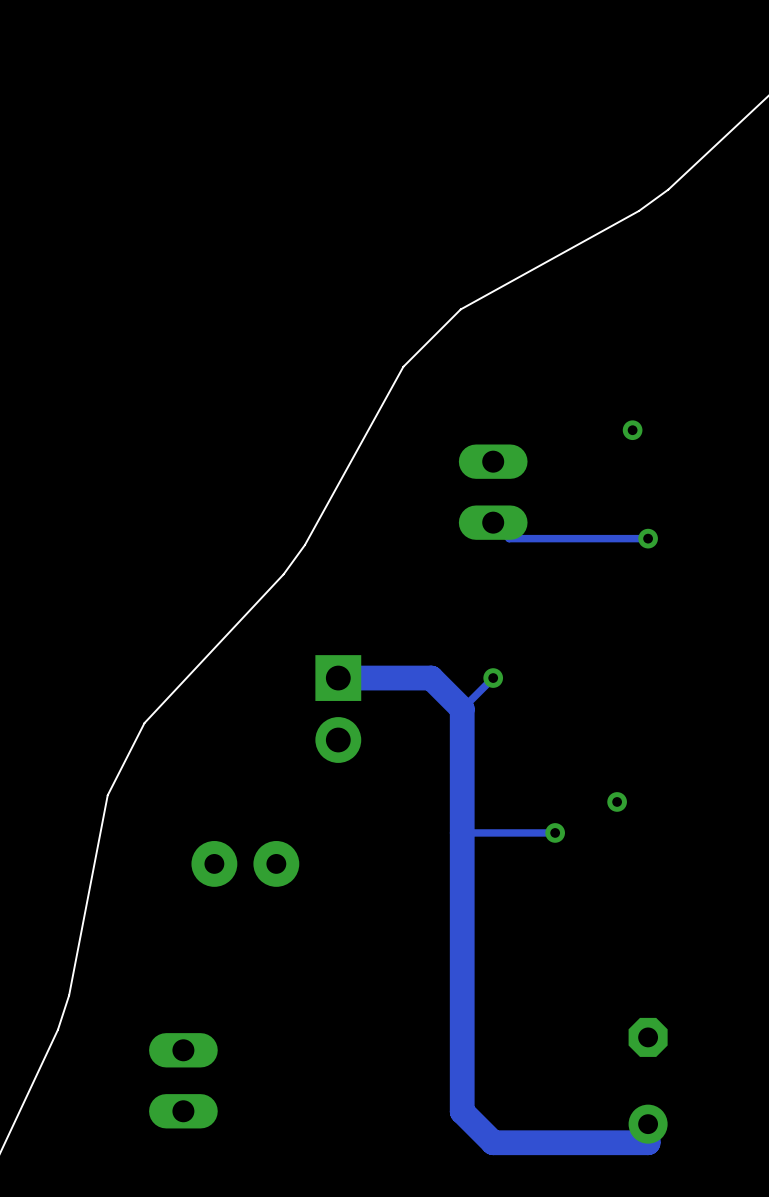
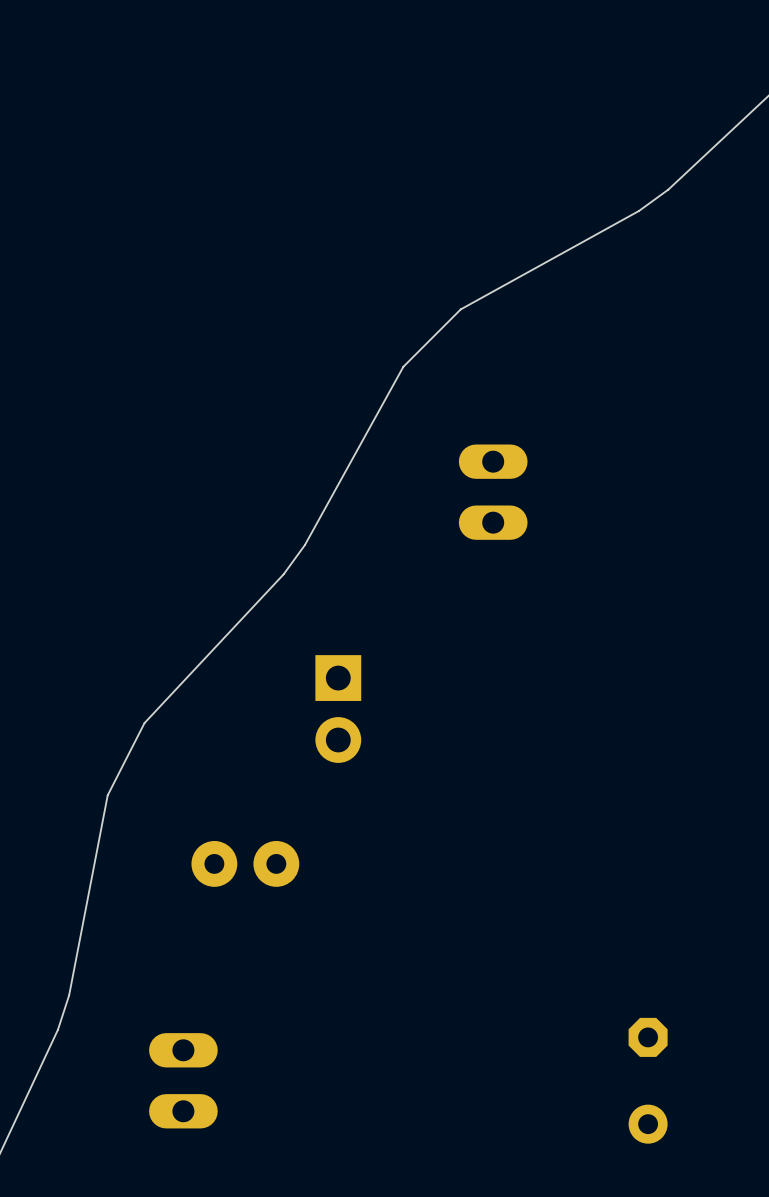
via: (632, 430) -> none
track: (493, 522) (509, 538) (648, 538) -> none
via: (648, 538) -> none
track: (338, 678) (431, 678) (462, 709) -> none
track: (493, 678) (462, 709) -> none
via: (493, 678) -> none
track: (462, 709) (462, 1111) (493, 1142) (648, 1142) (648, 1124) -> none
via: (617, 801) -> none
track: (555, 832) (462, 832) -> none
via: (555, 832) -> none

